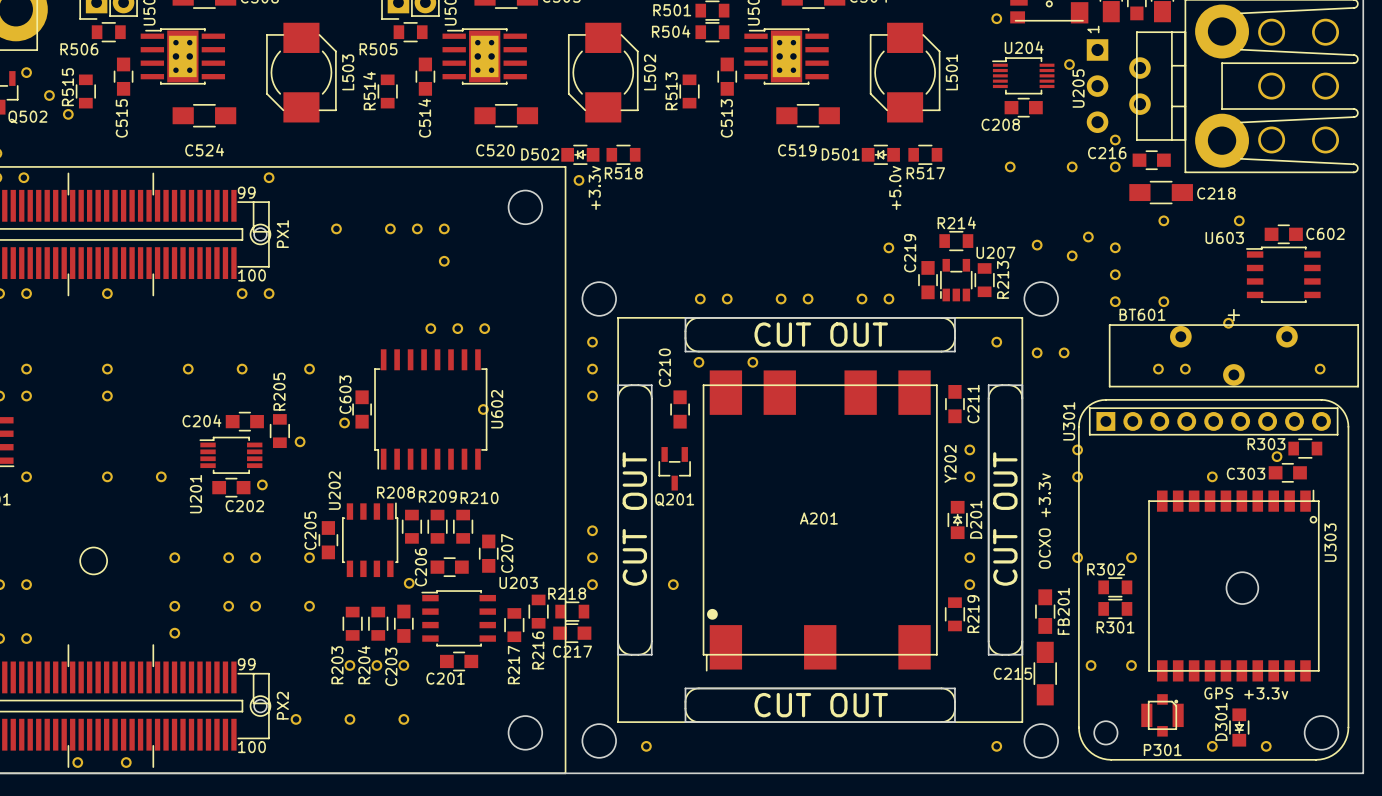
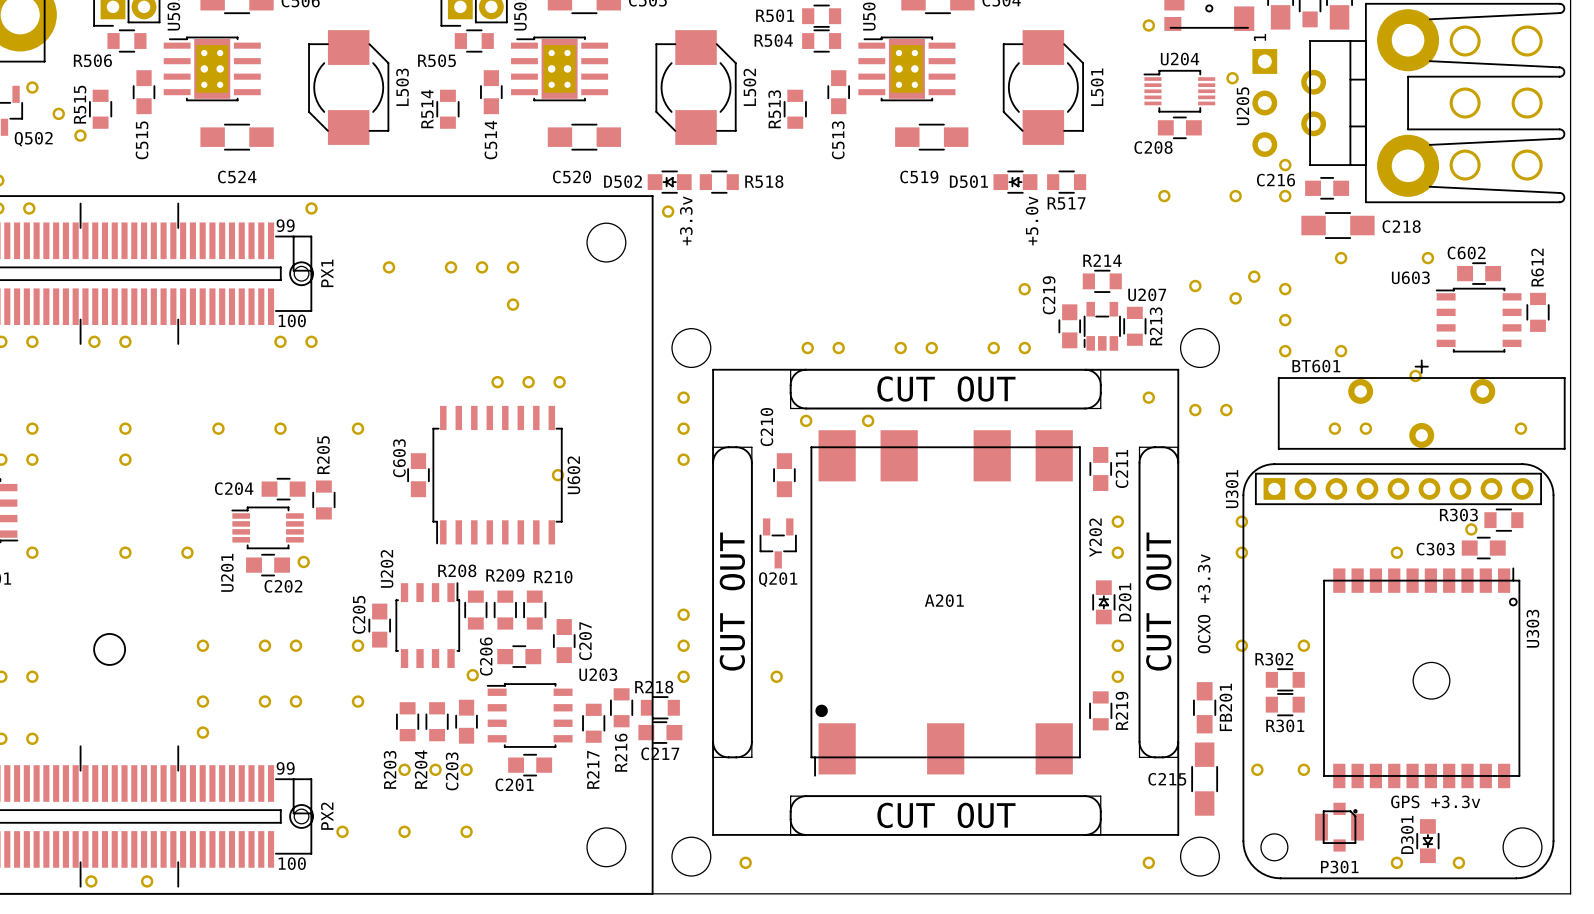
R518 name position: R518 (623, 173) -> R518 (764, 181)
C602 name position: C602 (1325, 233) -> C602 (1466, 252)
R612: none -> (1538, 312)
part: none -> (94, 341)
part: (344, 422) -> none
part: (300, 441) -> none

